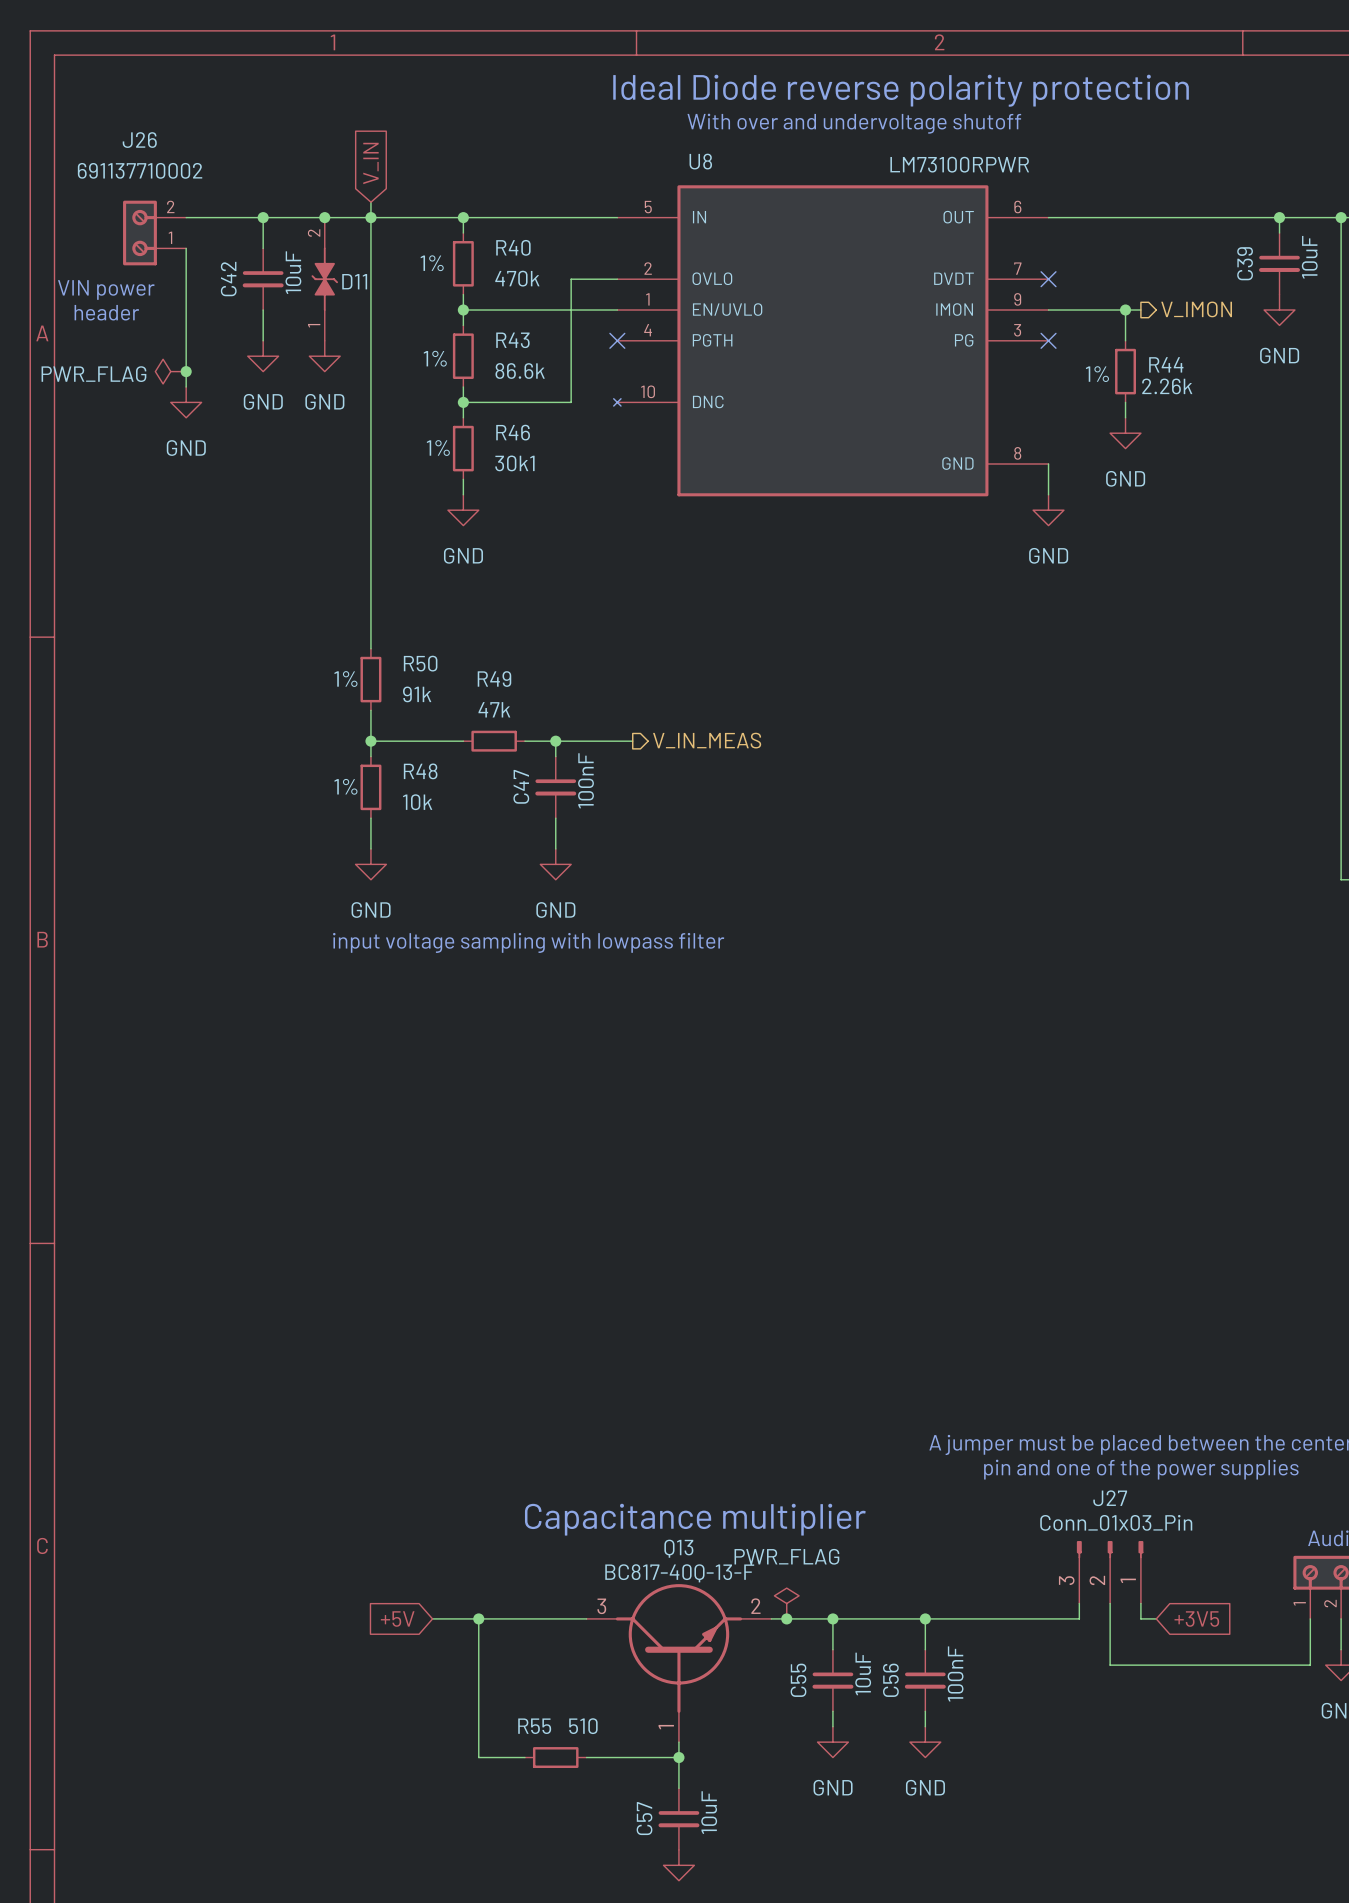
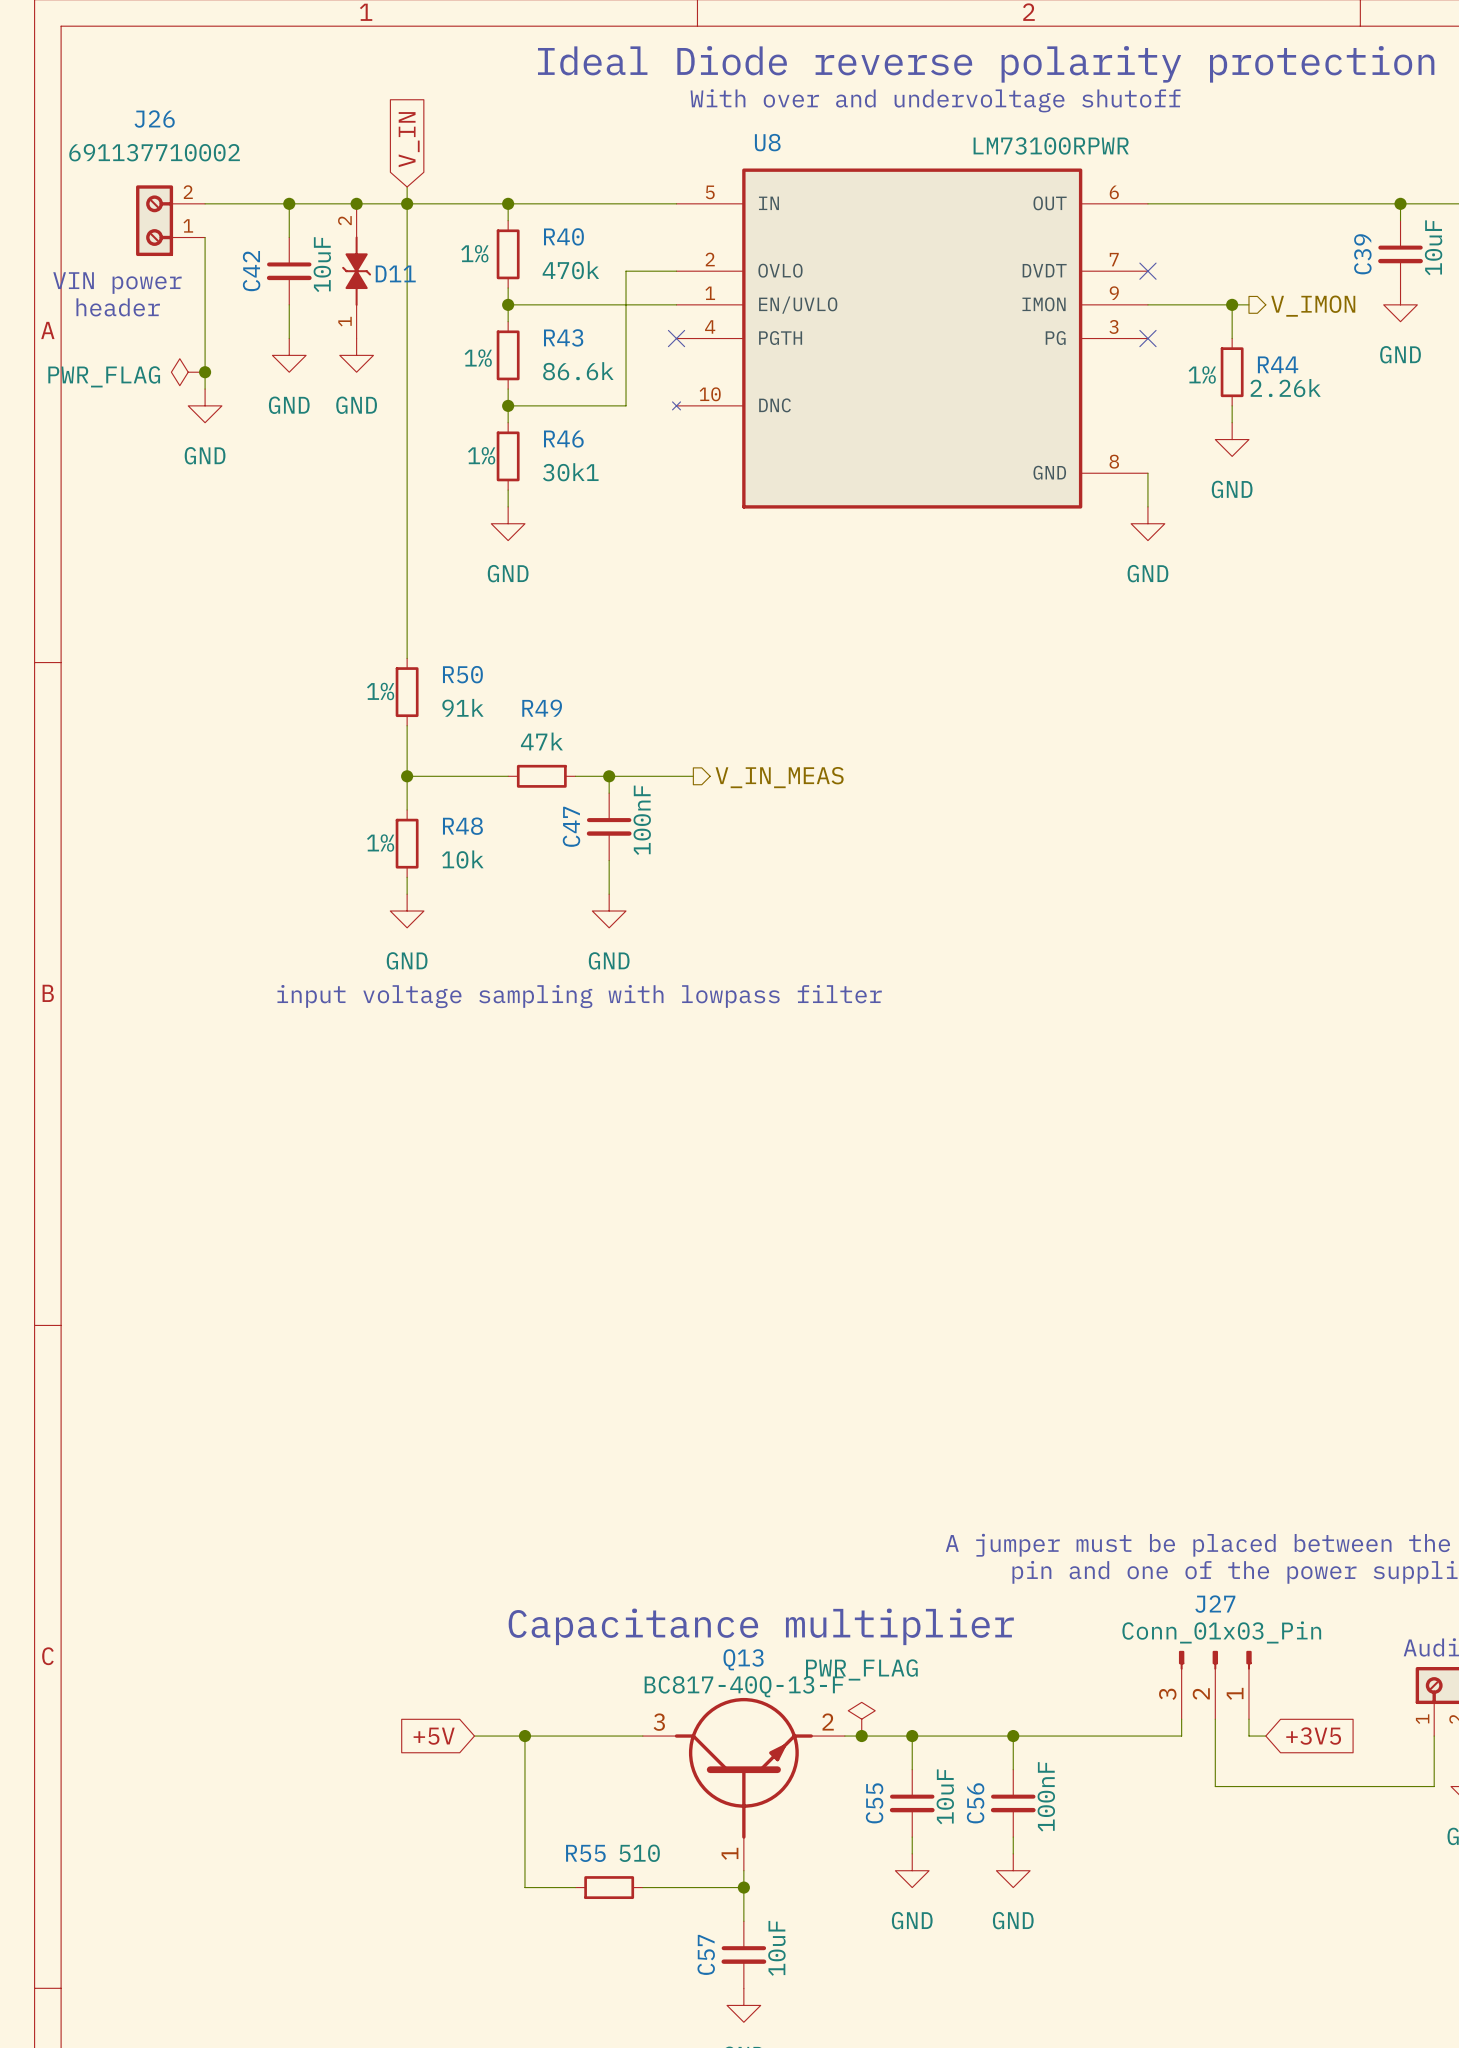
R50 position: (370, 679) -> (407, 692)
R48 position: (370, 787) -> (407, 843)

